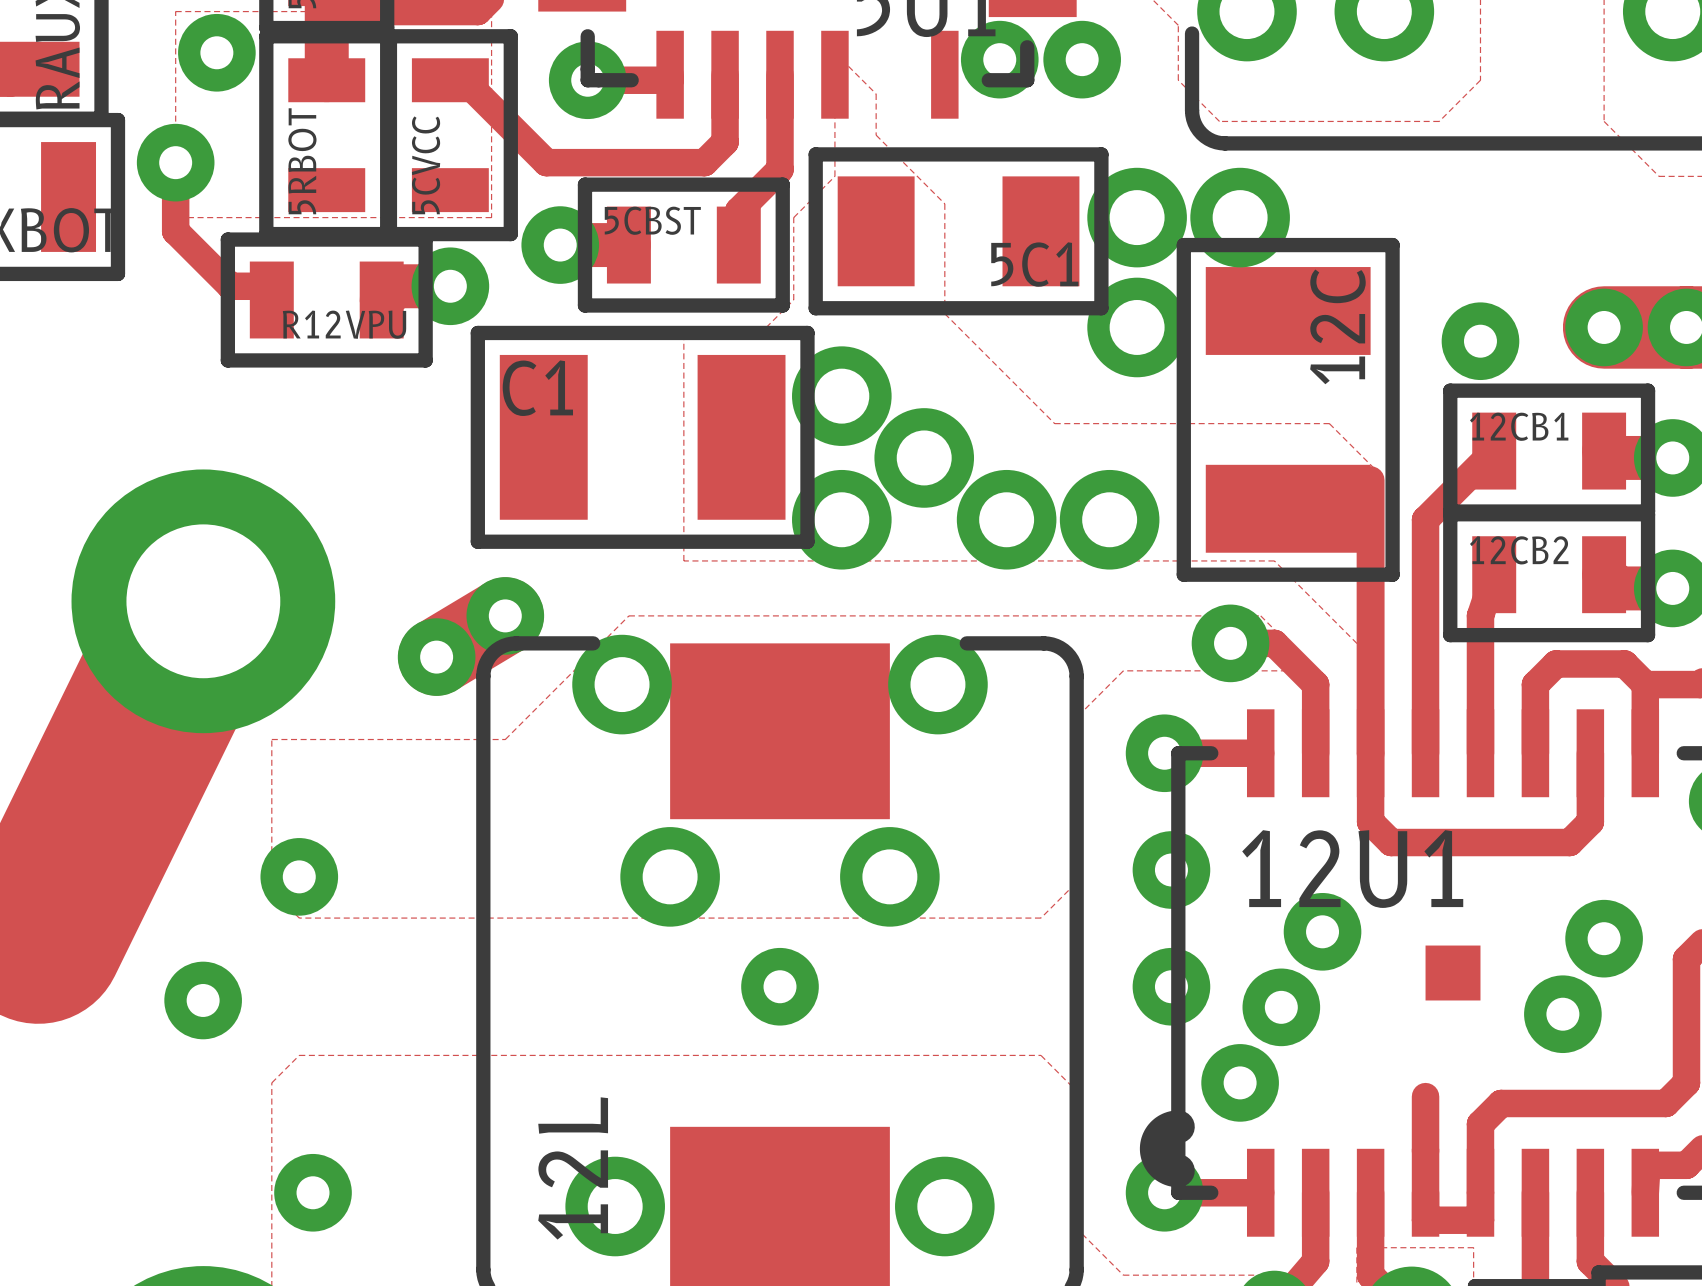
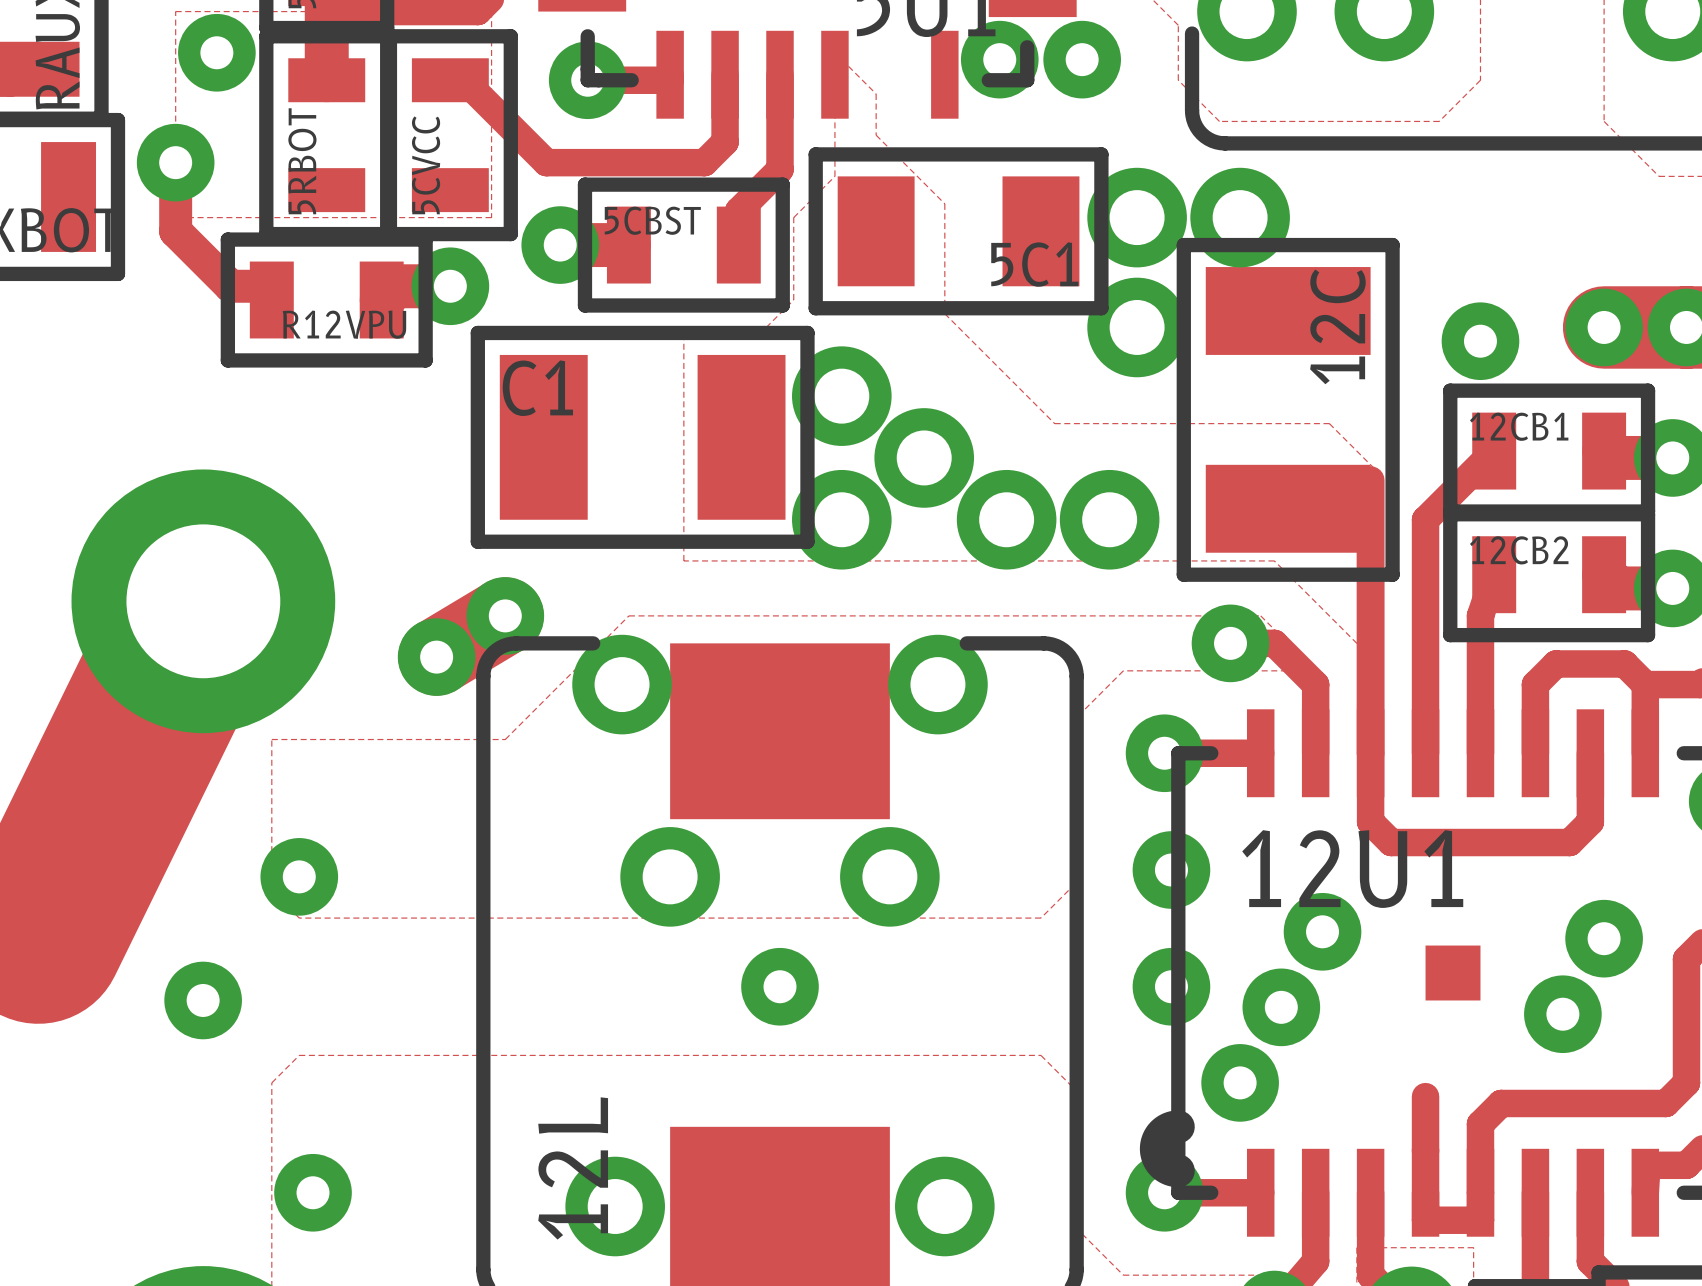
track width: thin (175, 162) (175, 231) (230, 286) (258, 286) (271, 300) -> thick (175, 162) (175, 231) (230, 286) (258, 286) (271, 300)

